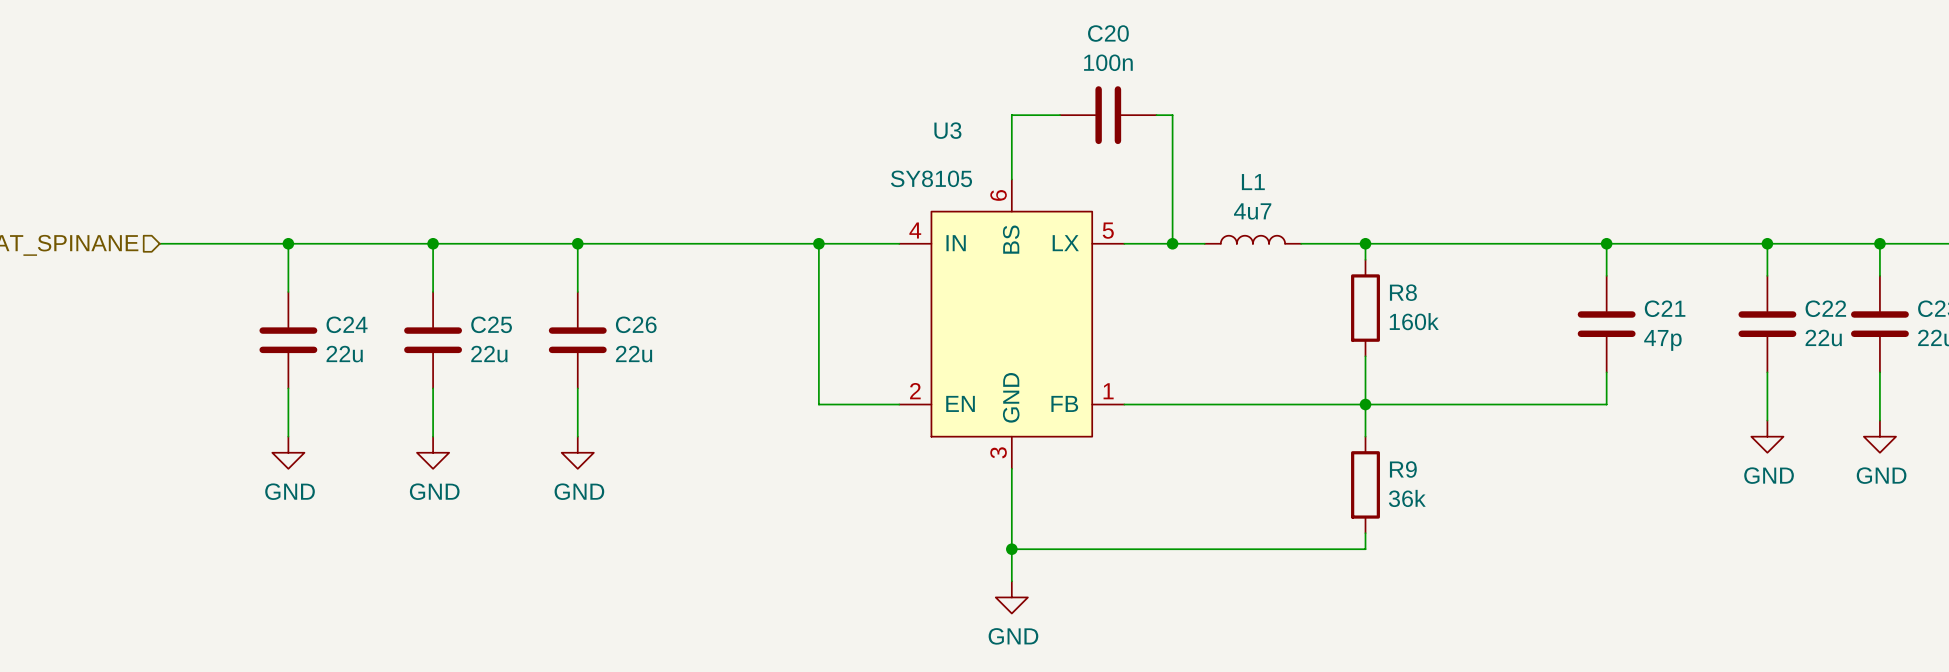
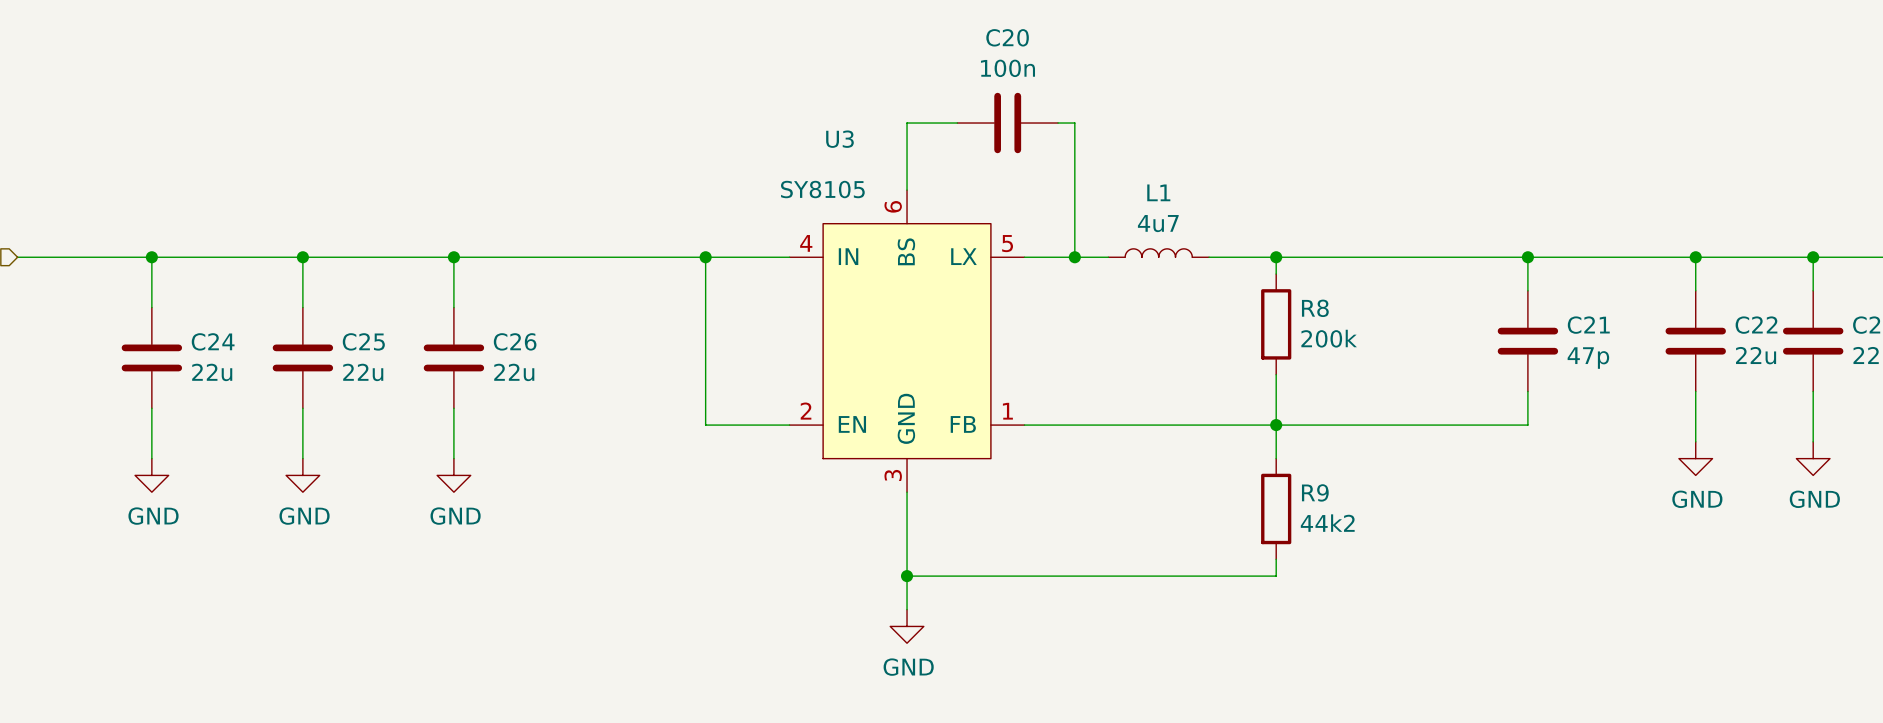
R8 value: 160k (1414, 321) -> 200k (1329, 338)
R9 value: 36k (1407, 498) -> 44k2 (1327, 523)

